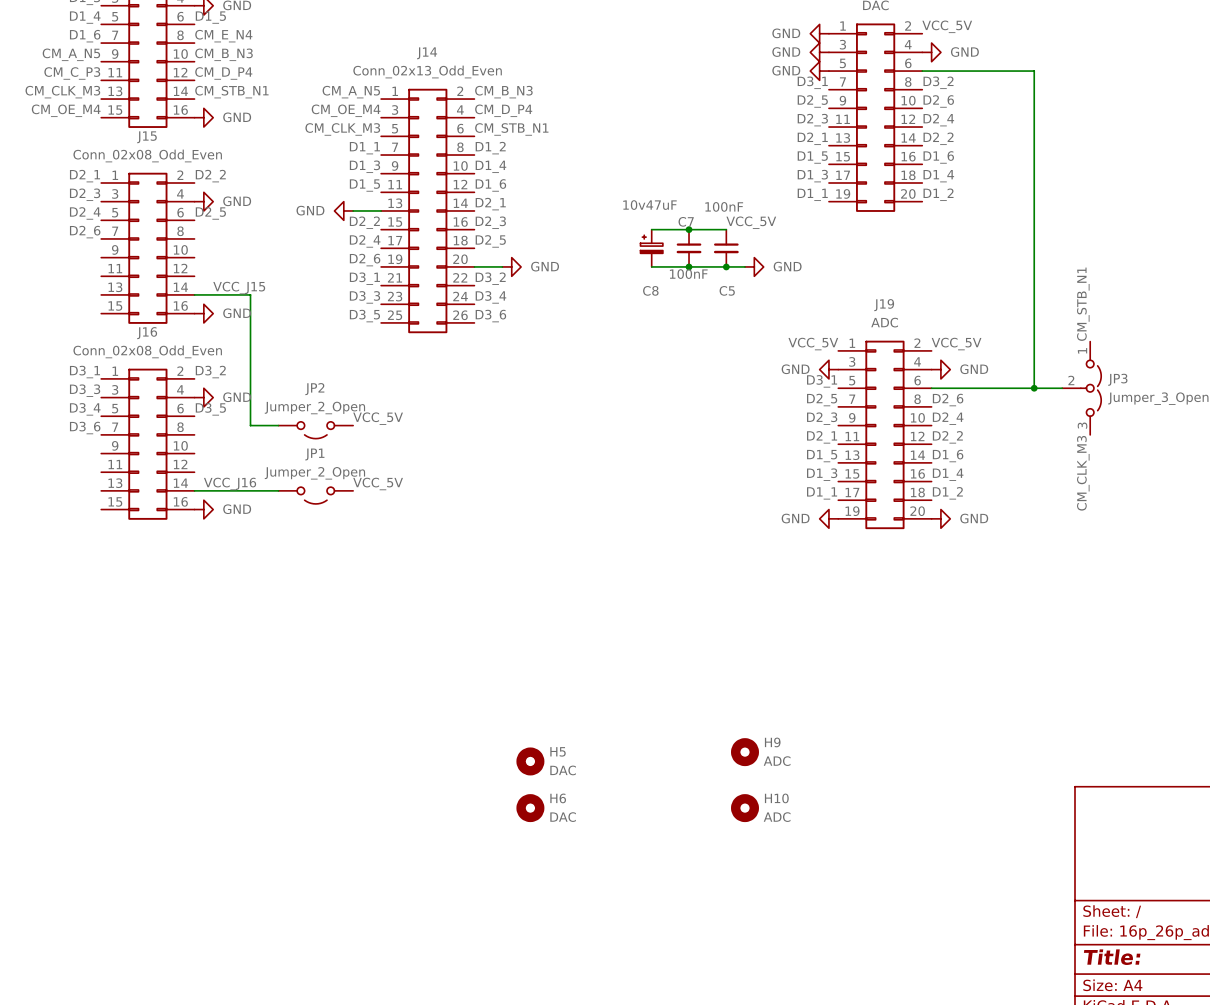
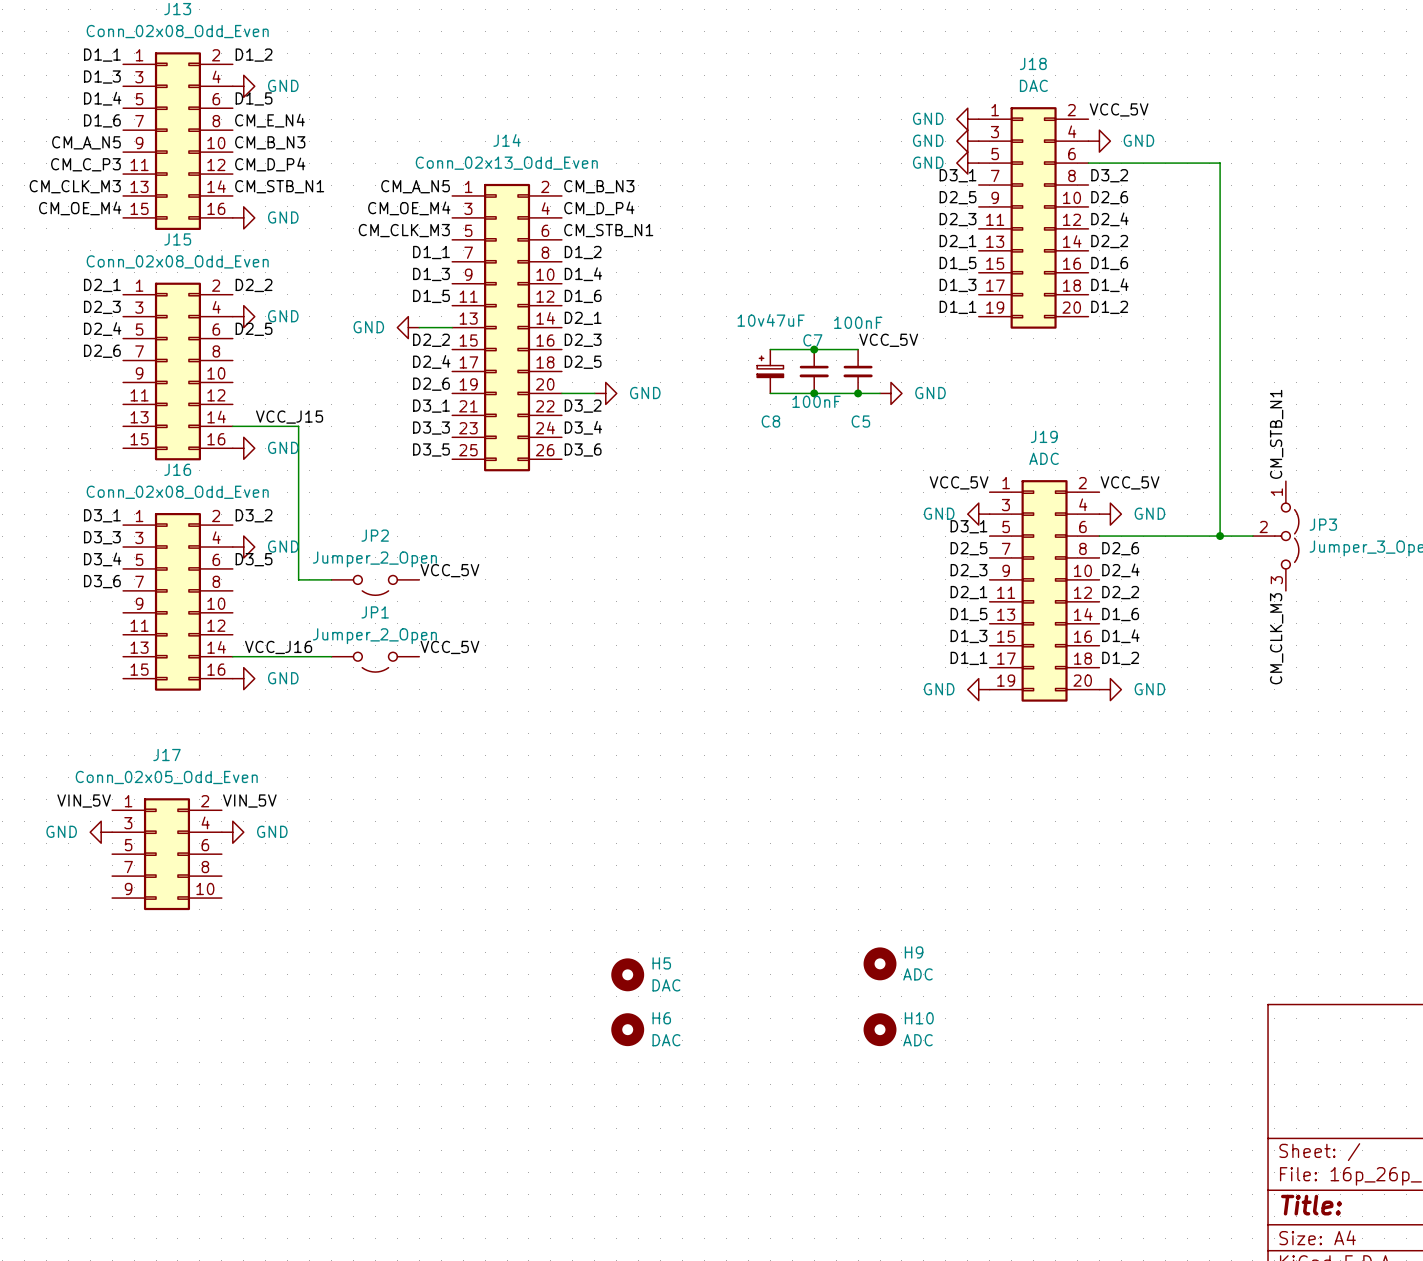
label: none -> VIN_5V (84, 801)
label: none -> VIN_5V (249, 801)
power symbol: none -> GND (101, 832)
power symbol: none -> GND (232, 832)
J17: none -> Conn_02x05_Odd_Even (166, 854)

